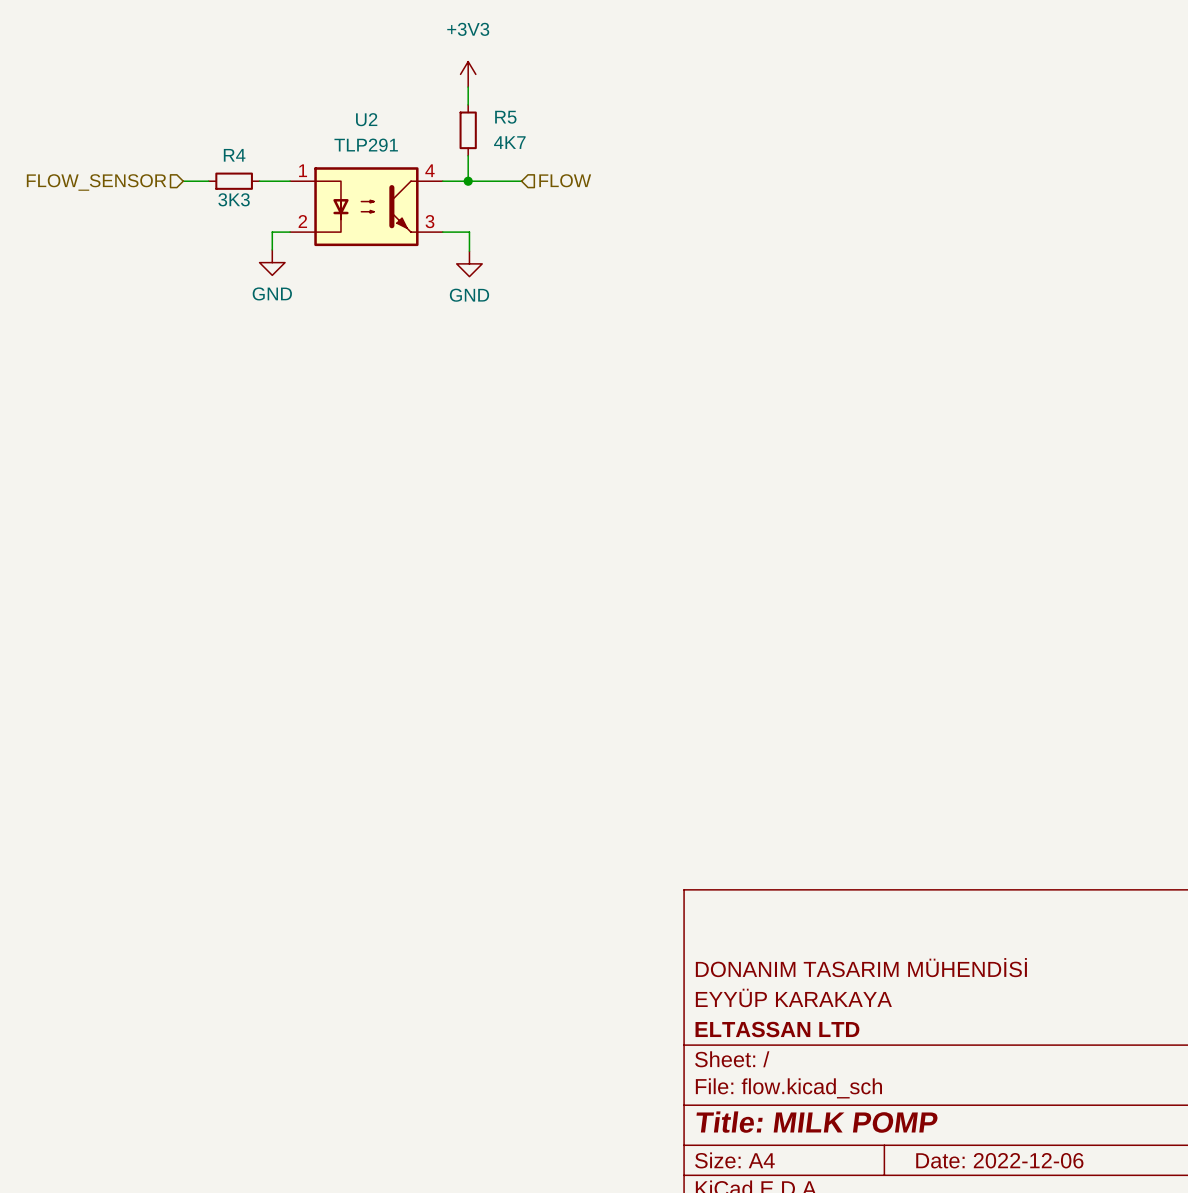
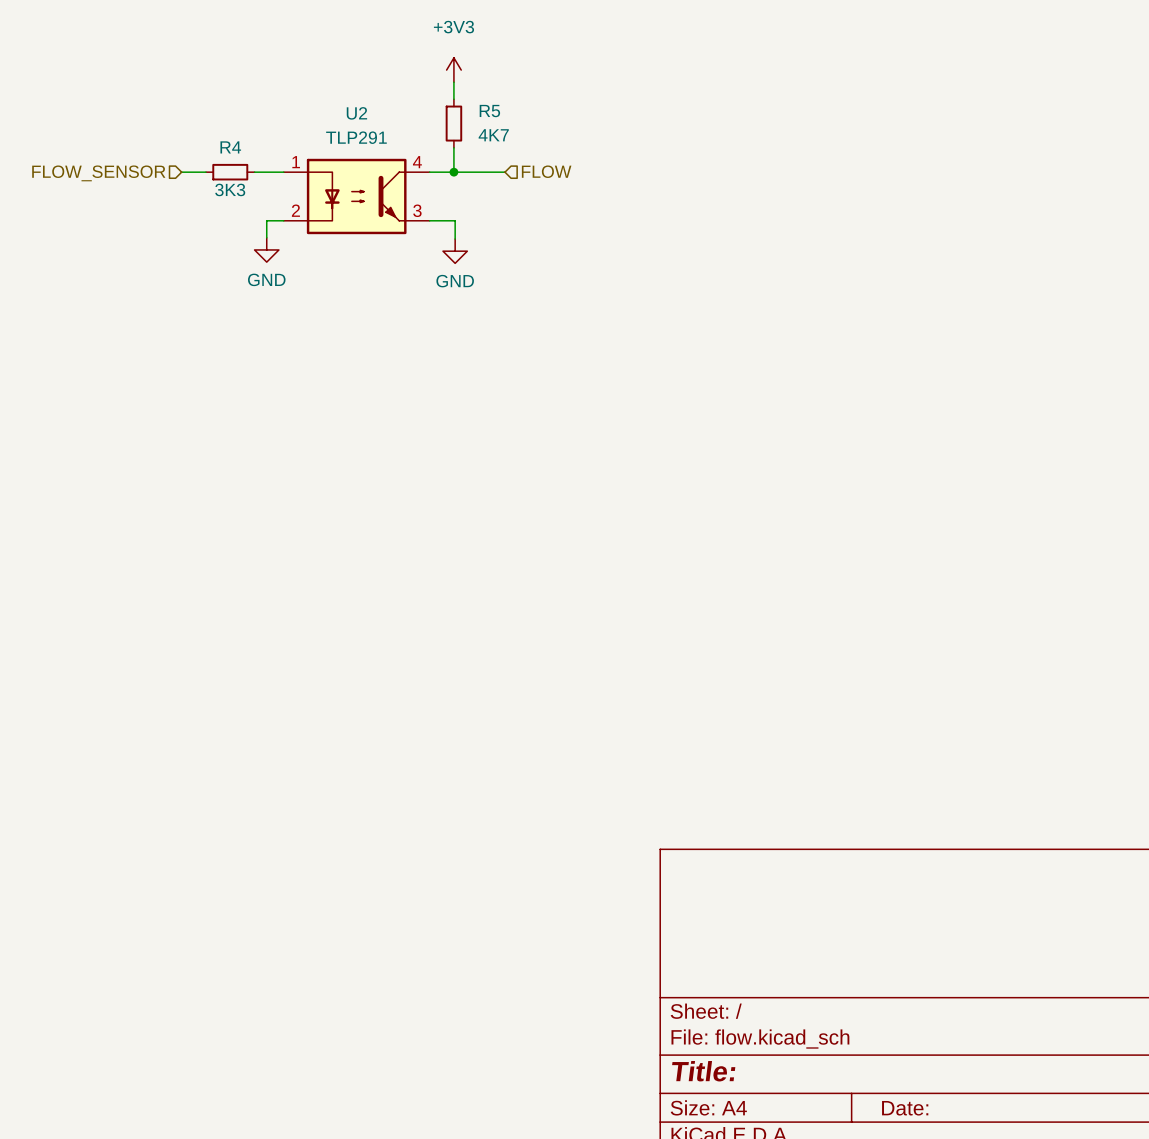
title block: DONANIM TASARIM MÜHENDİSİ (861, 967) -> none
title block: EYYÜP KARAKAYA (793, 997) -> none
title block: ELTASSAN LTD (777, 1029) -> none
title block: Title: MILK POMP (817, 1122) -> Title: (703, 1071)
title block: Date: 2022-12-06 (999, 1160) -> Date: (905, 1108)

